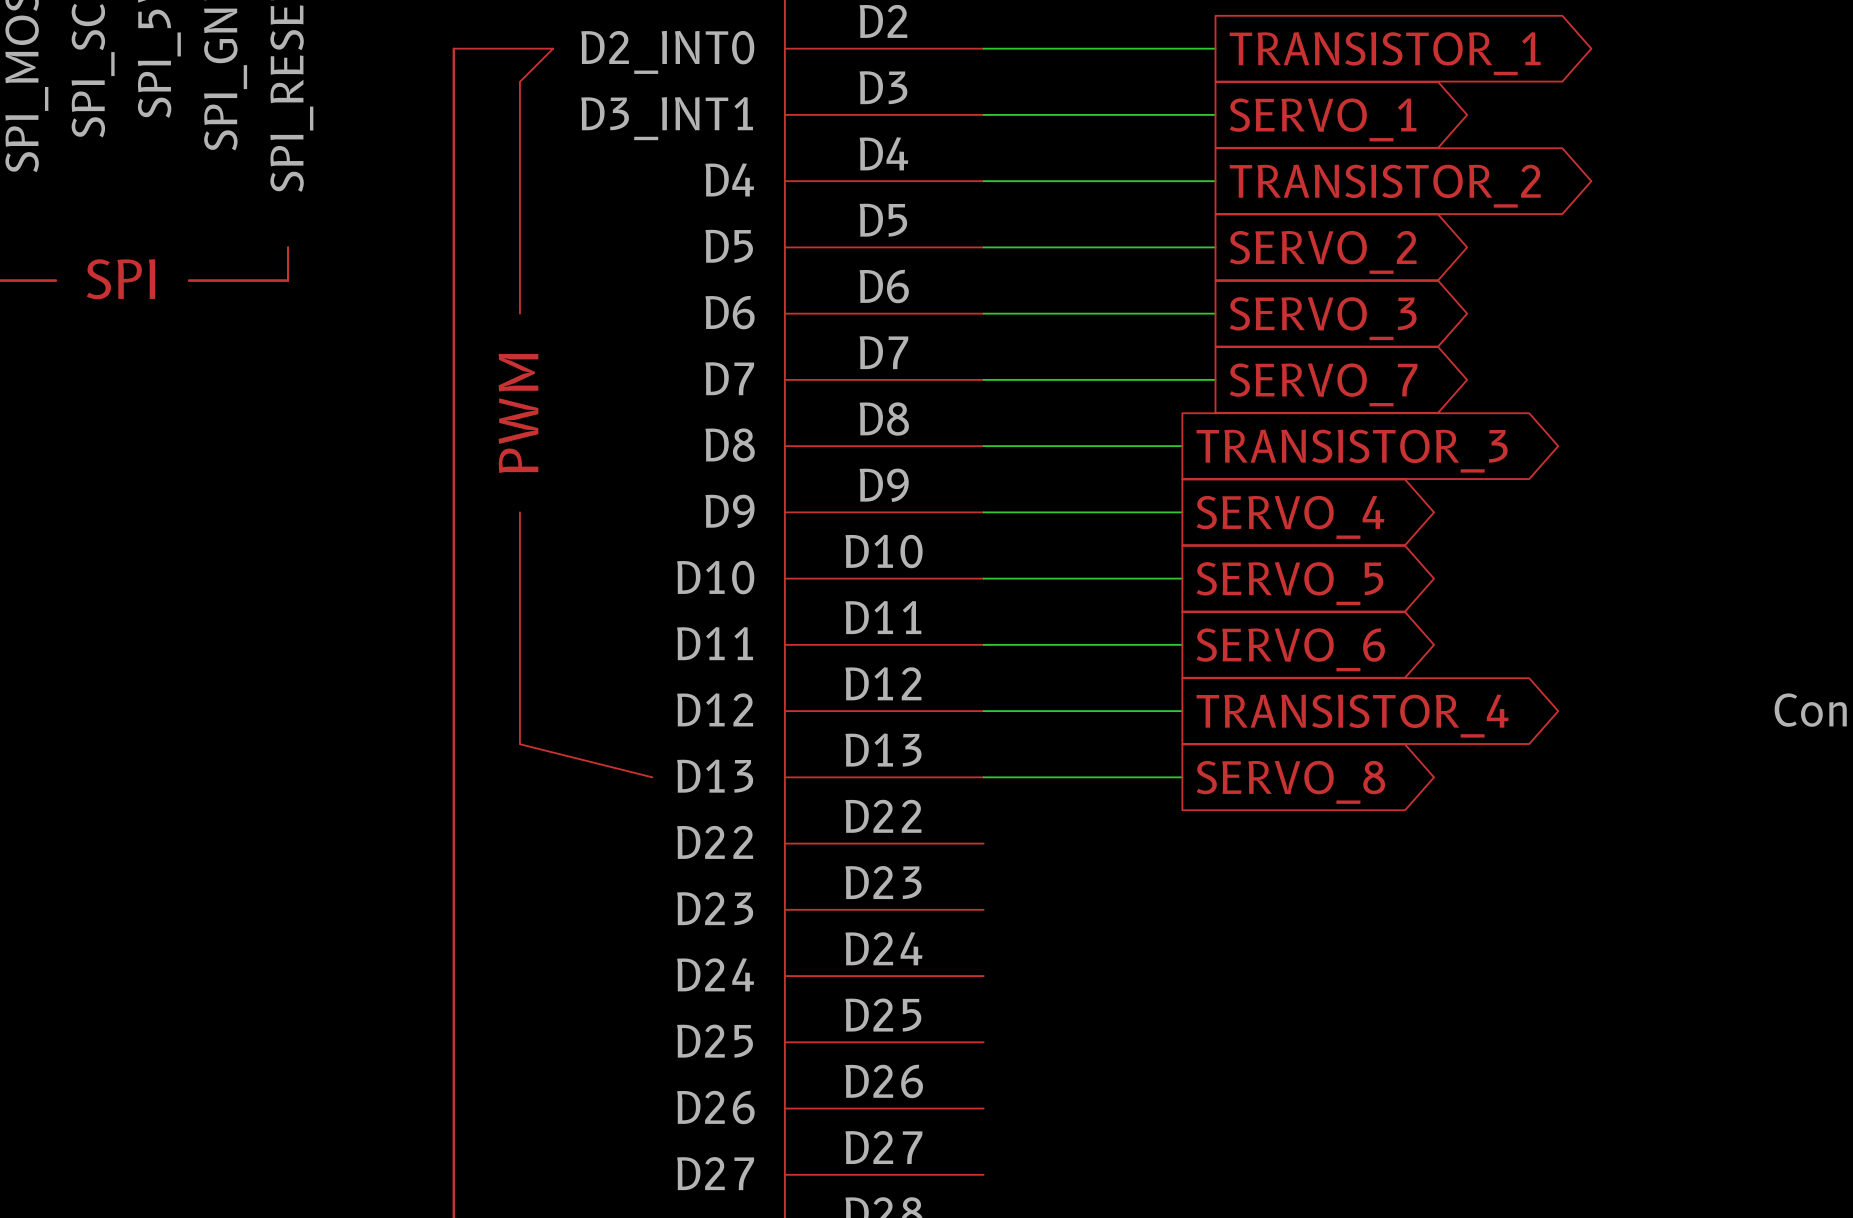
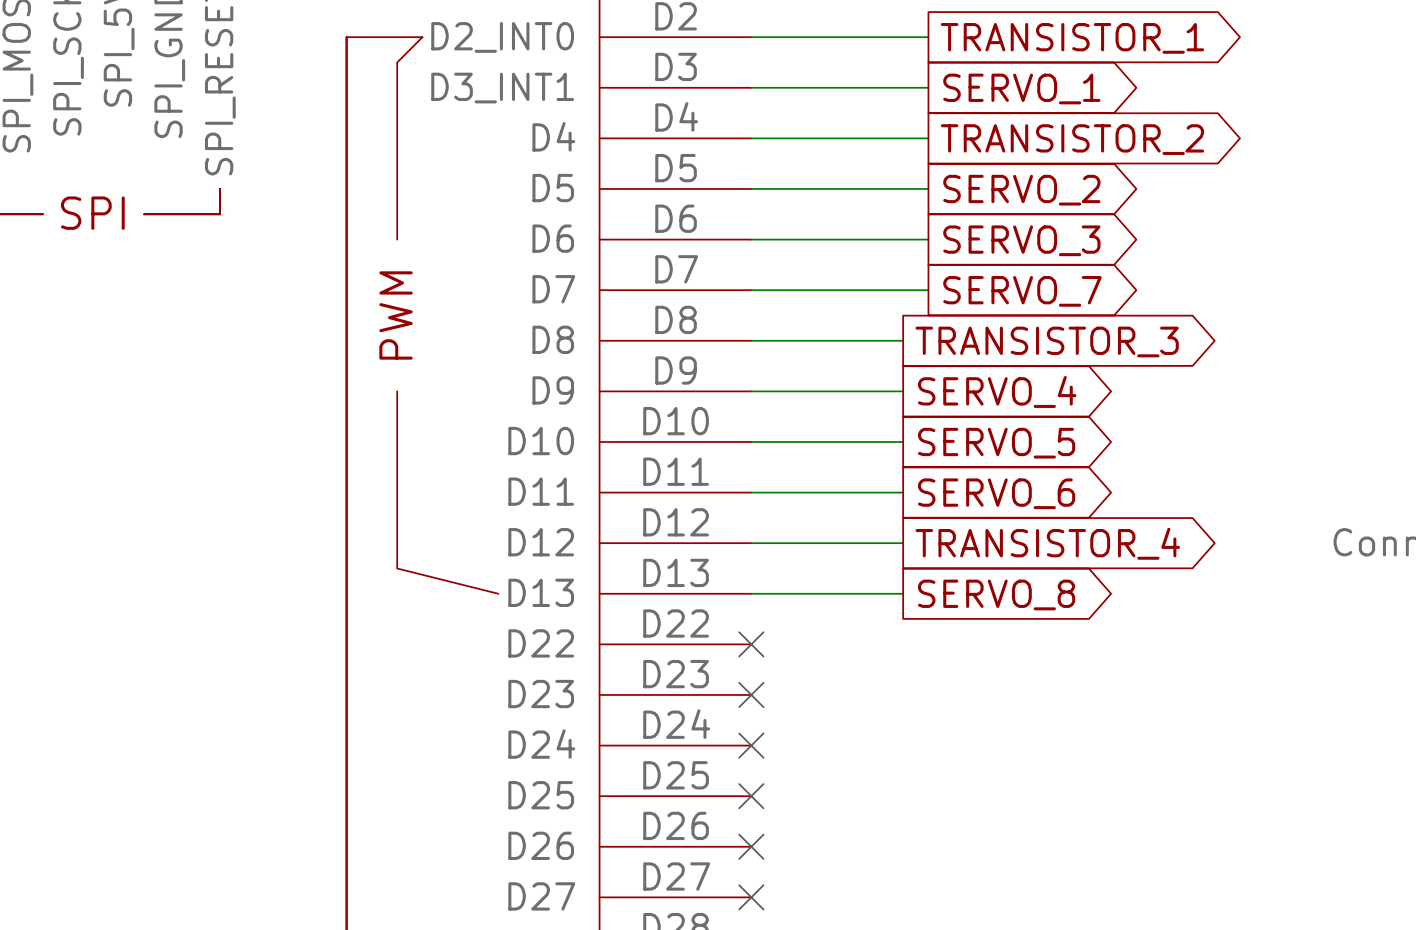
no-connect mark: none -> (751, 644)
no-connect mark: none -> (751, 694)
no-connect mark: none -> (751, 745)
no-connect mark: none -> (751, 796)
no-connect mark: none -> (751, 846)
no-connect mark: none -> (751, 897)

